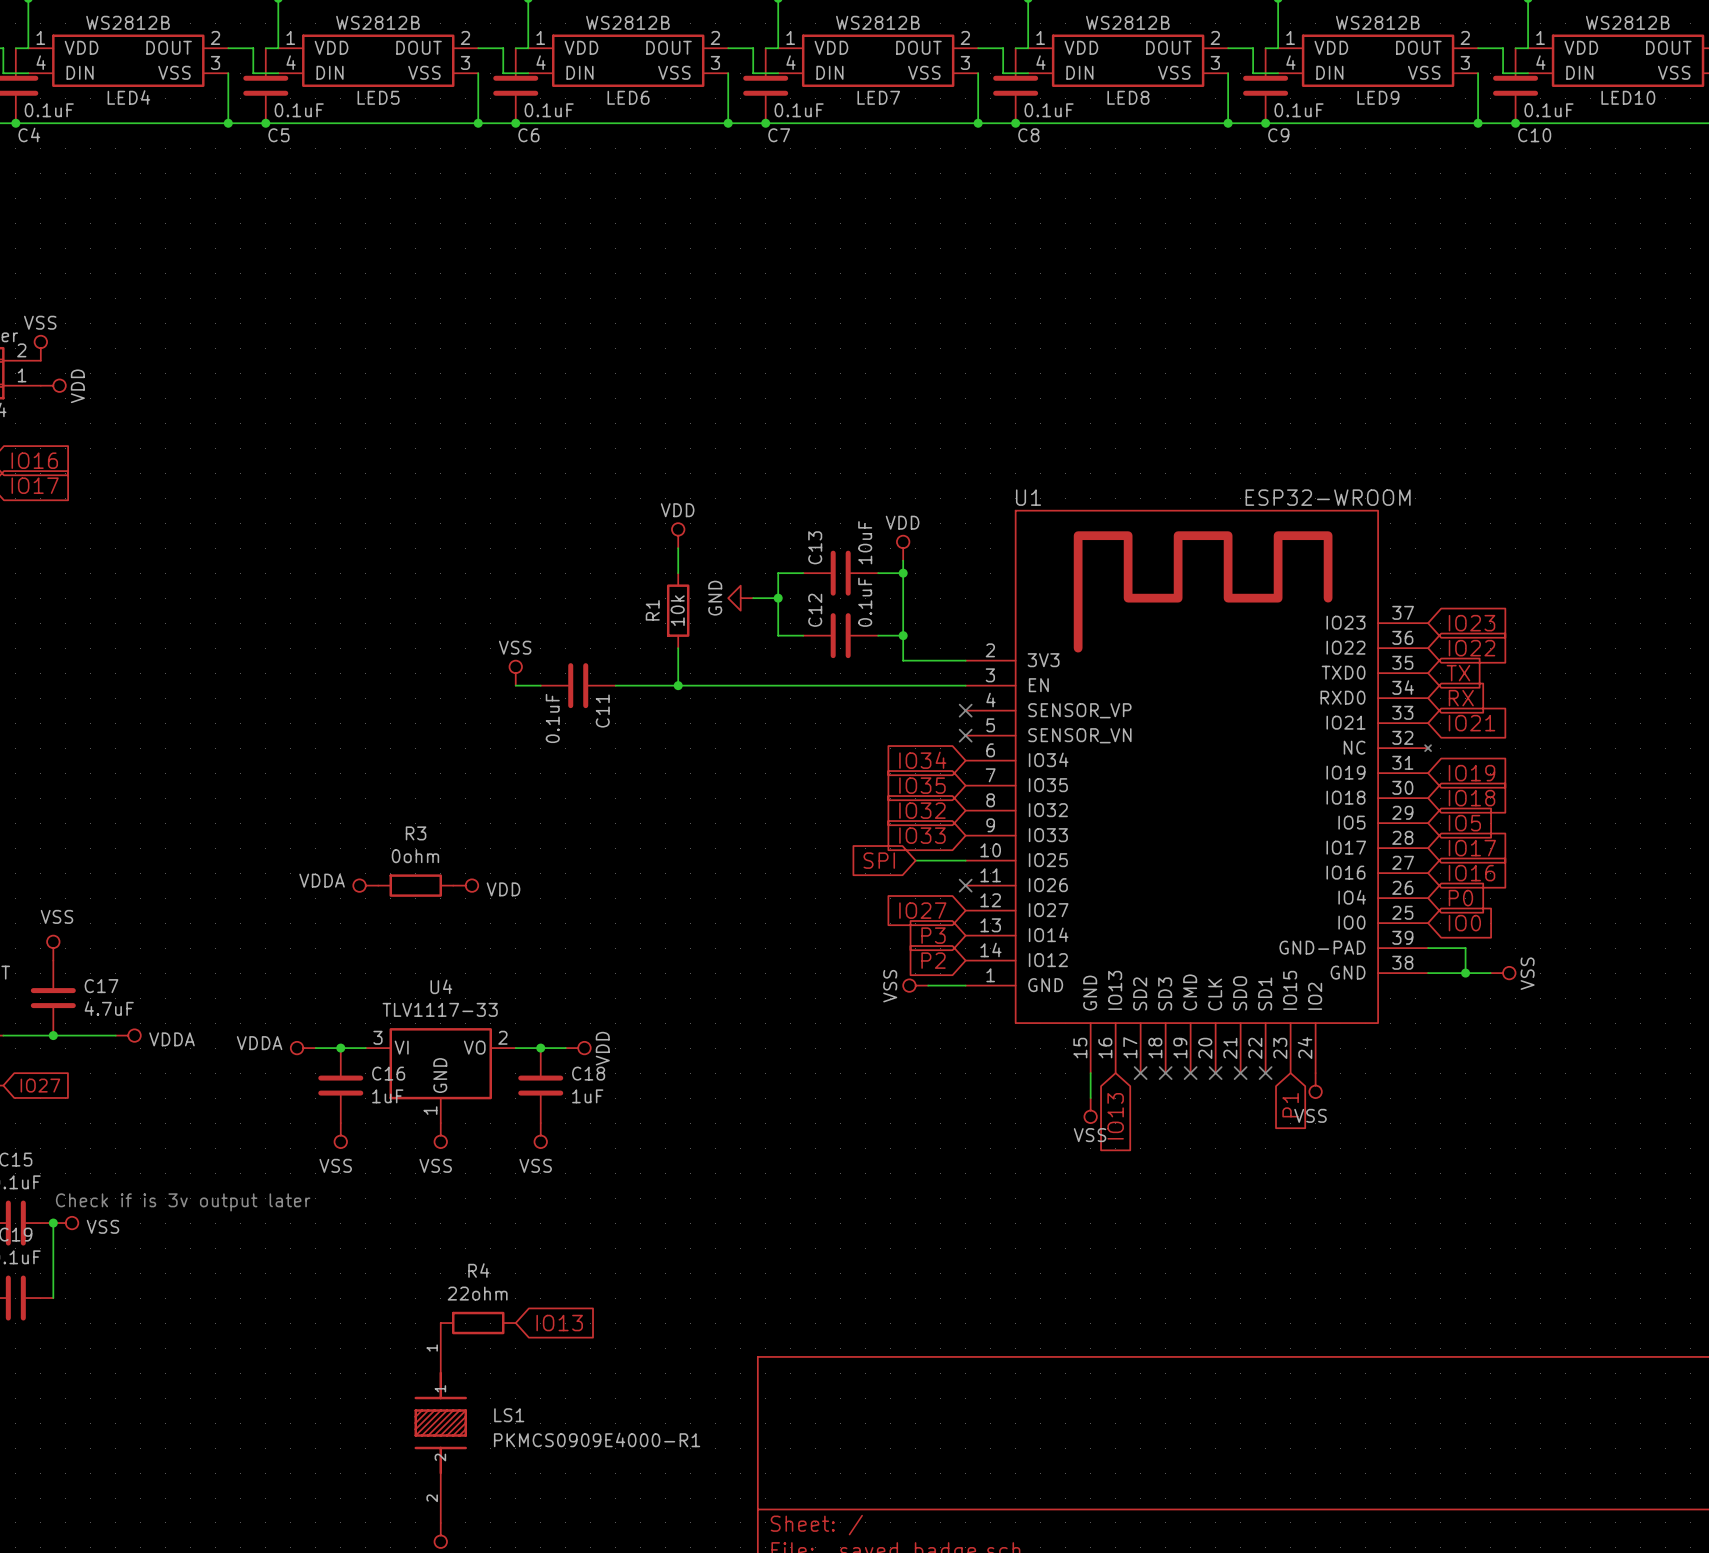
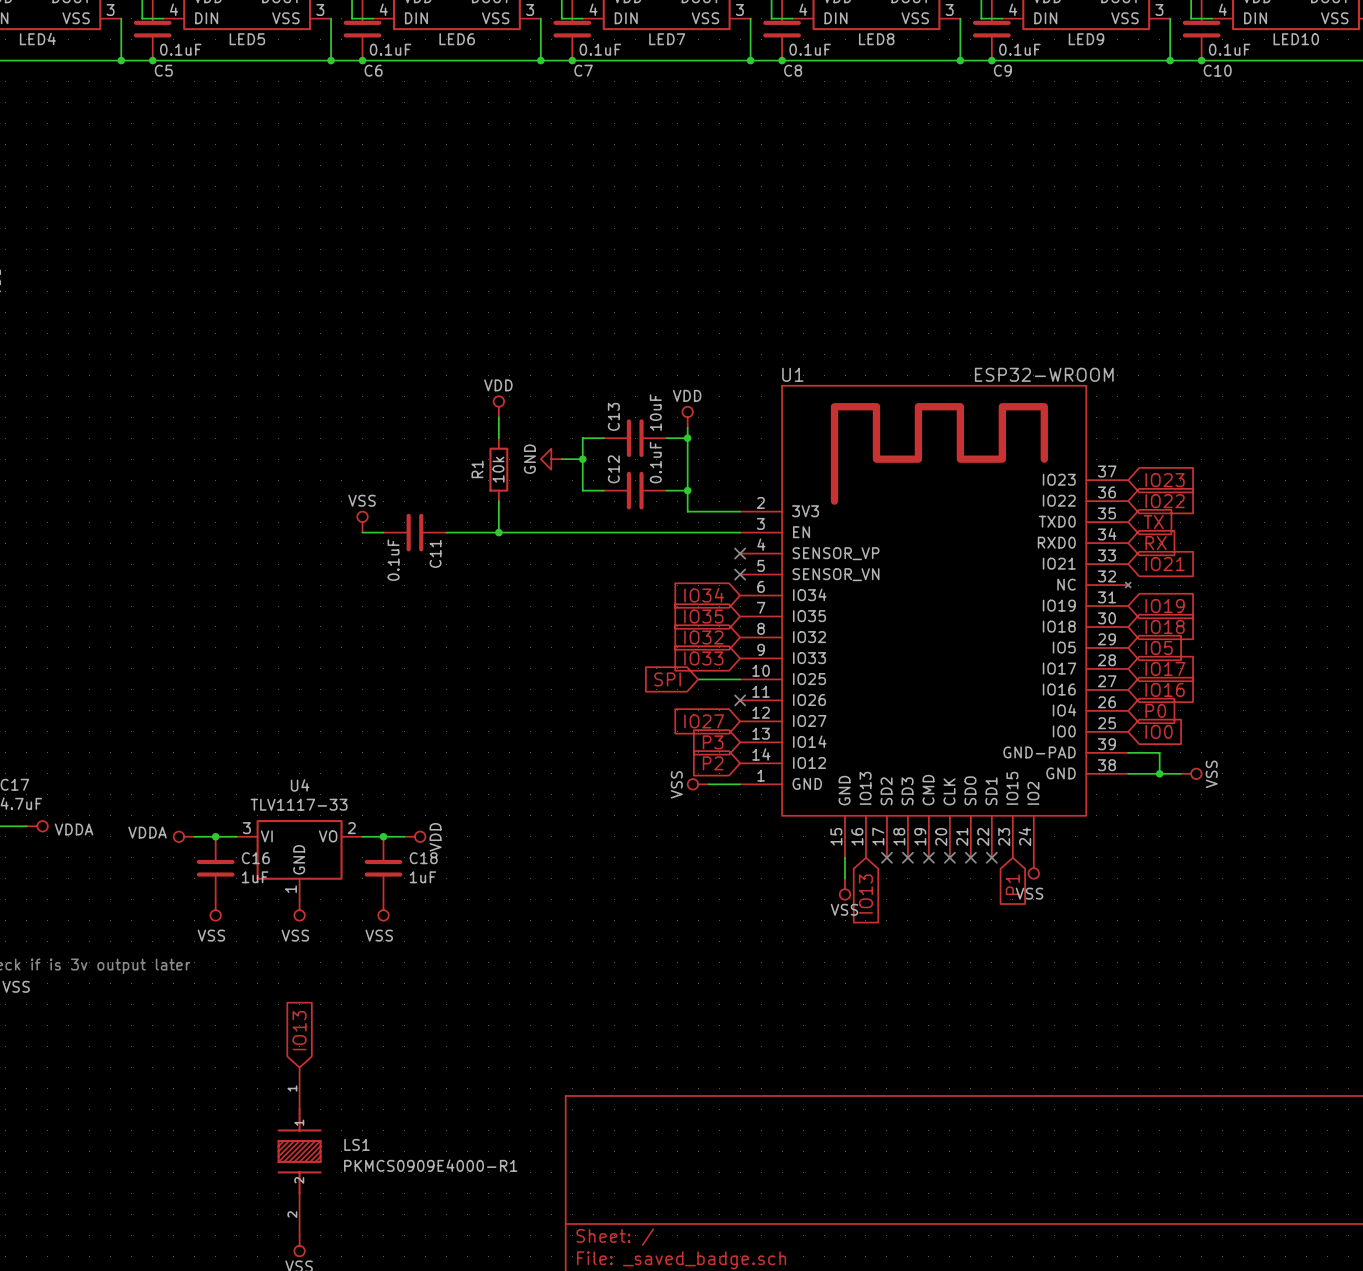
power symbol: VDDA (365, 885) -> none
R3: 0ohm (415, 885) -> none
power symbol: VDD (465, 885) -> none
R4: 22ohm (478, 1323) -> none
global label rotation: 0° (559, 1323) -> 90° counterclockwise (299, 1030)
global label position: IO13 (559, 1323) -> IO13 (299, 1030)

